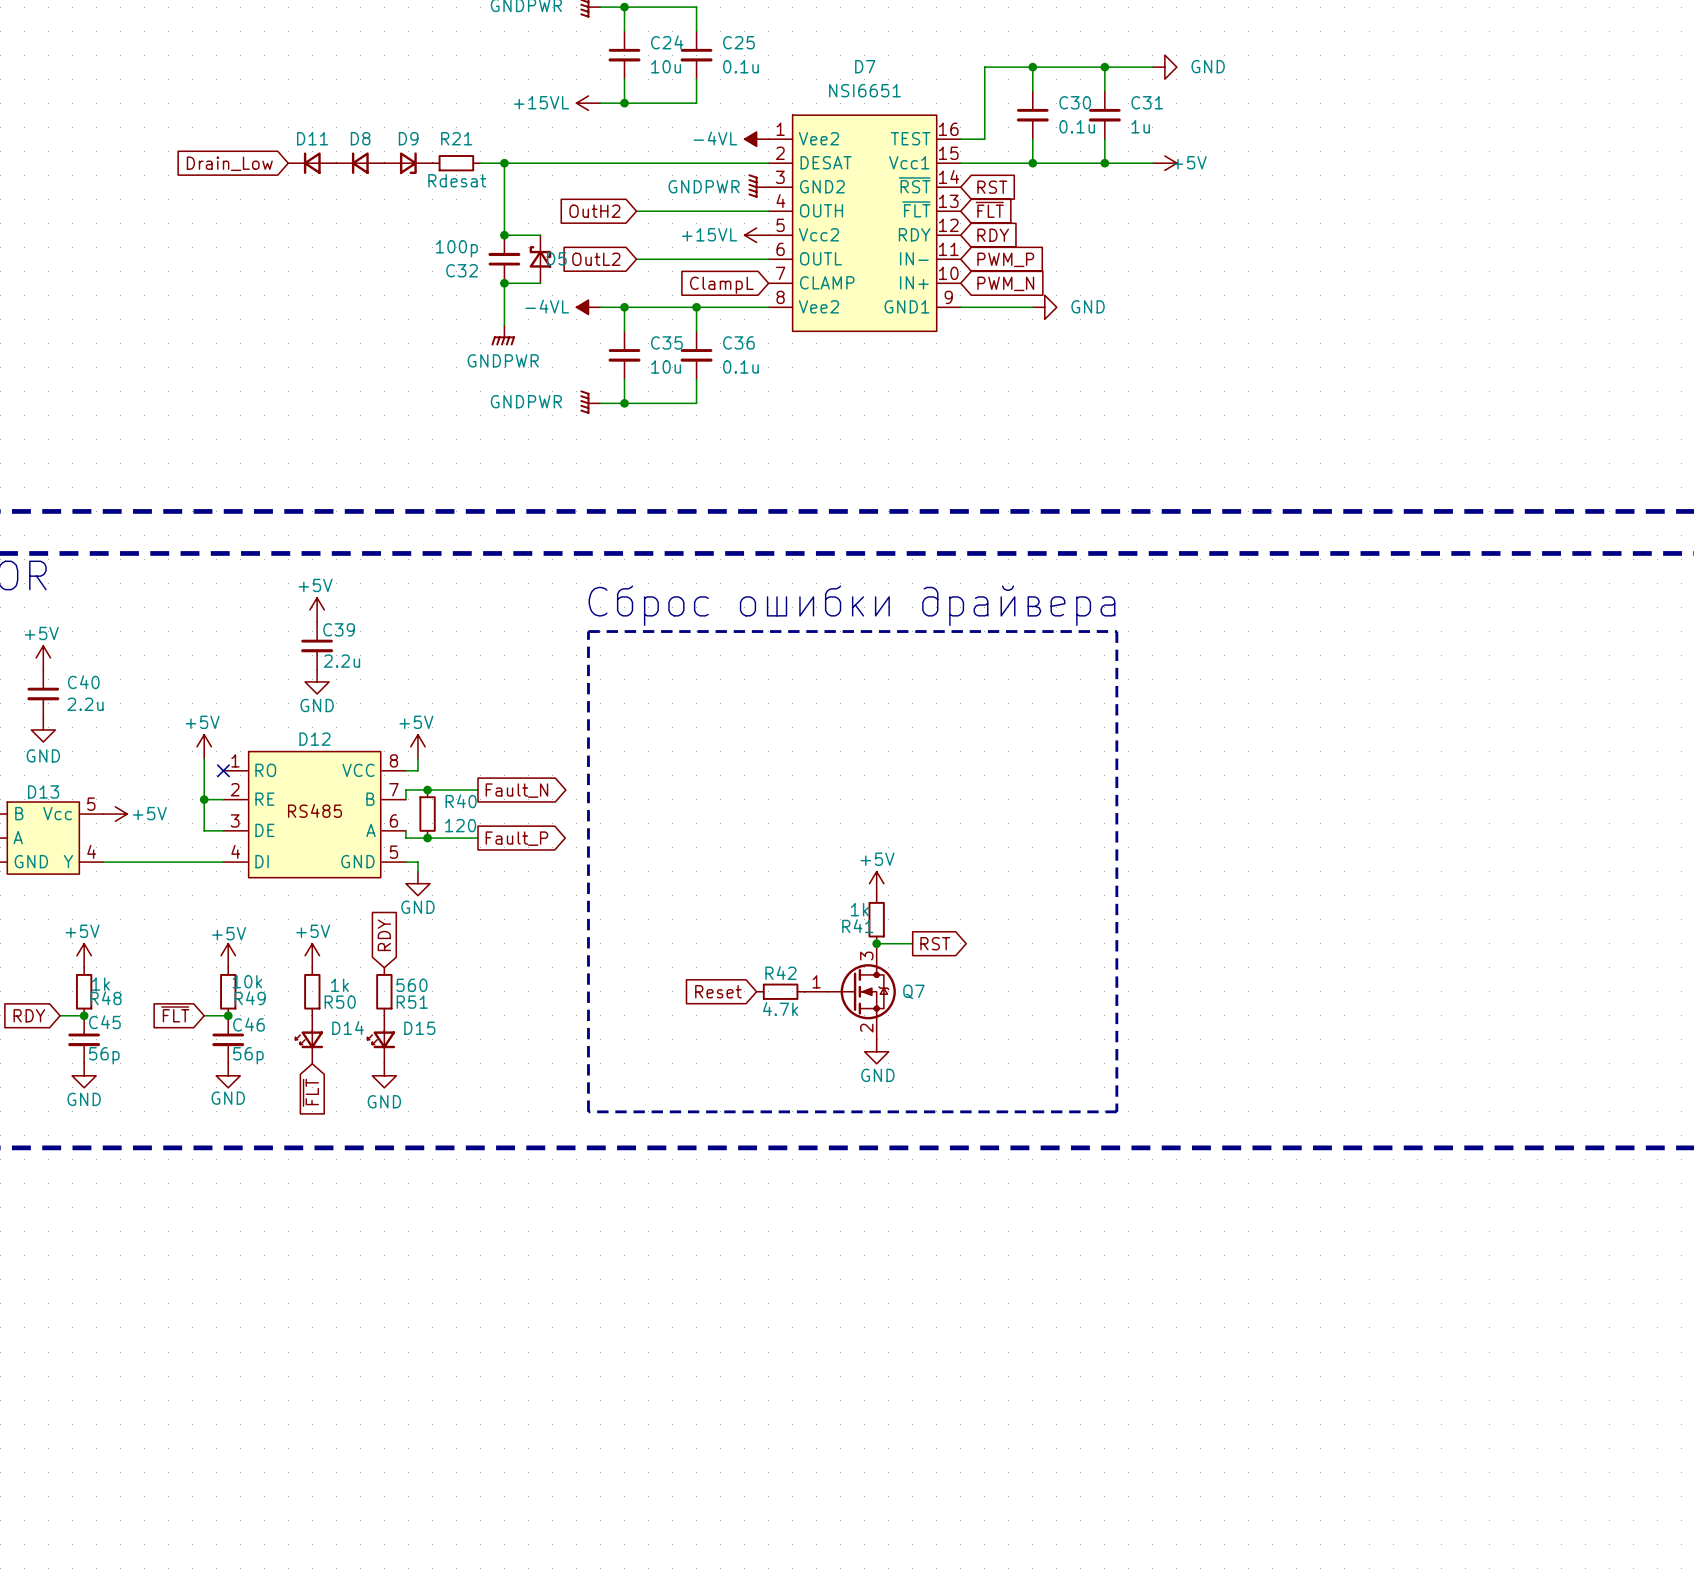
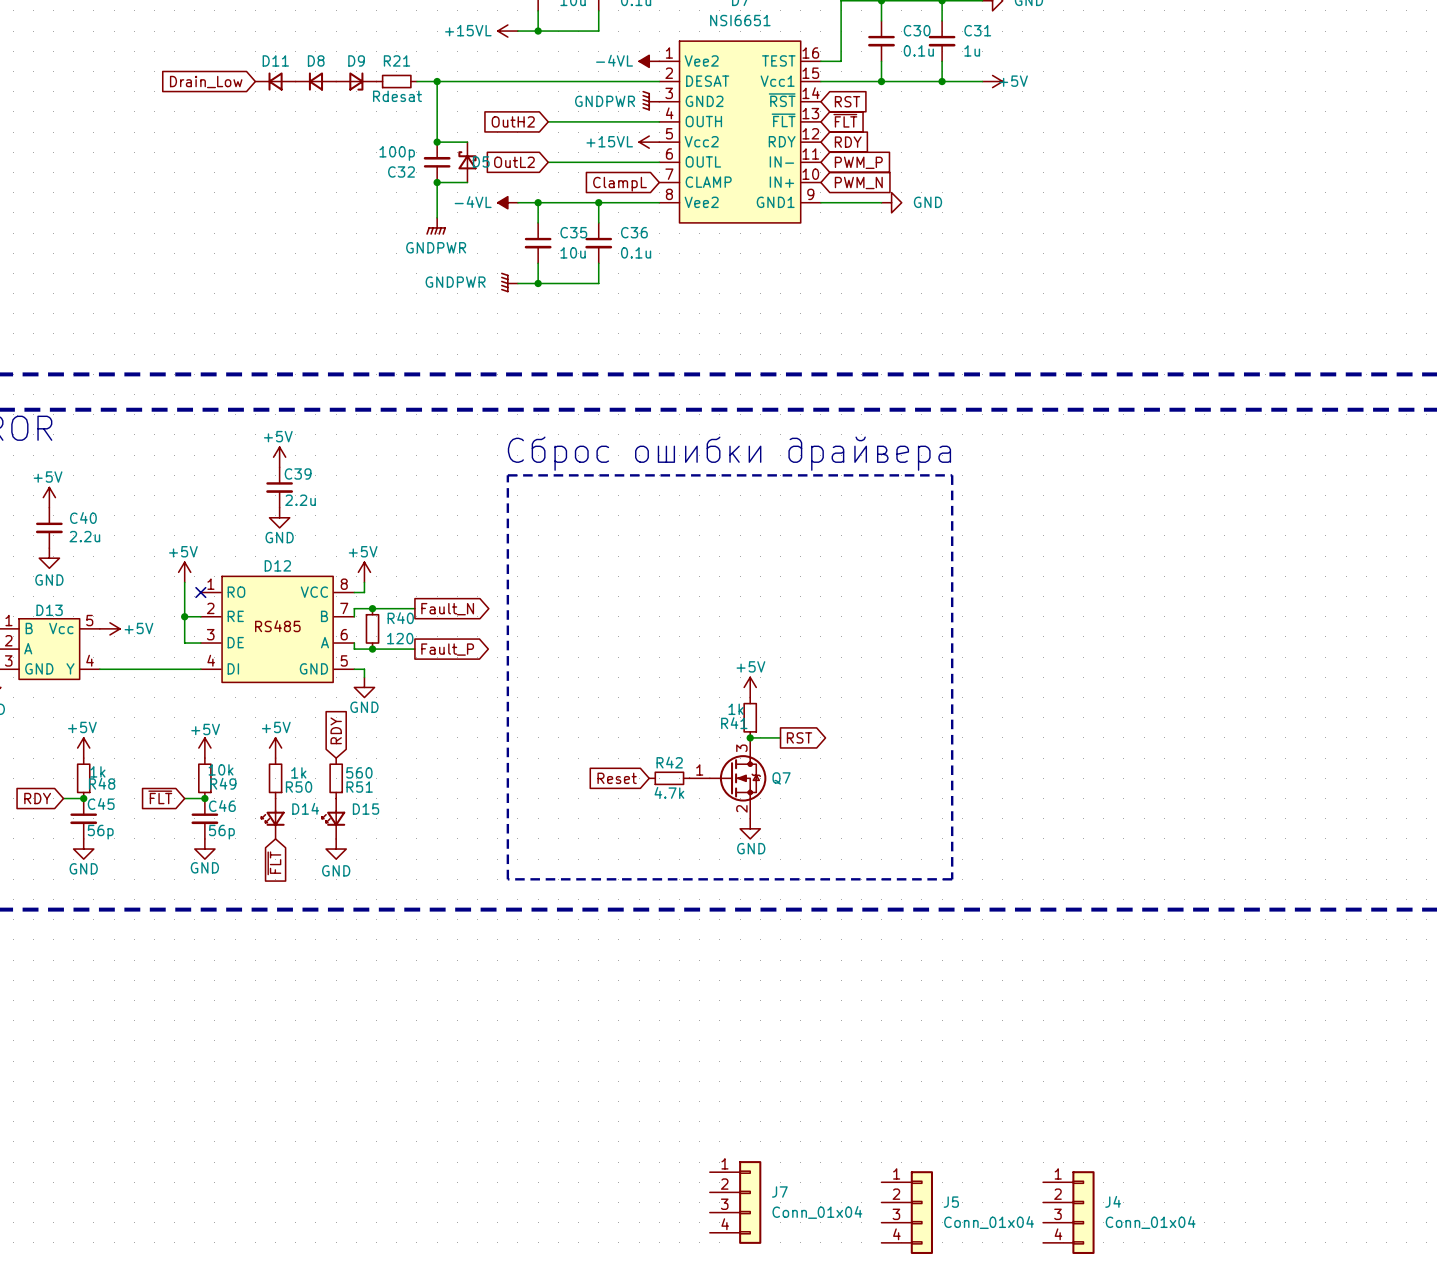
J7: none -> Conn_01x04 (735, 1202)
J5: none -> Conn_01x04 (907, 1212)
J4: none -> Conn_01x04 (1068, 1212)

